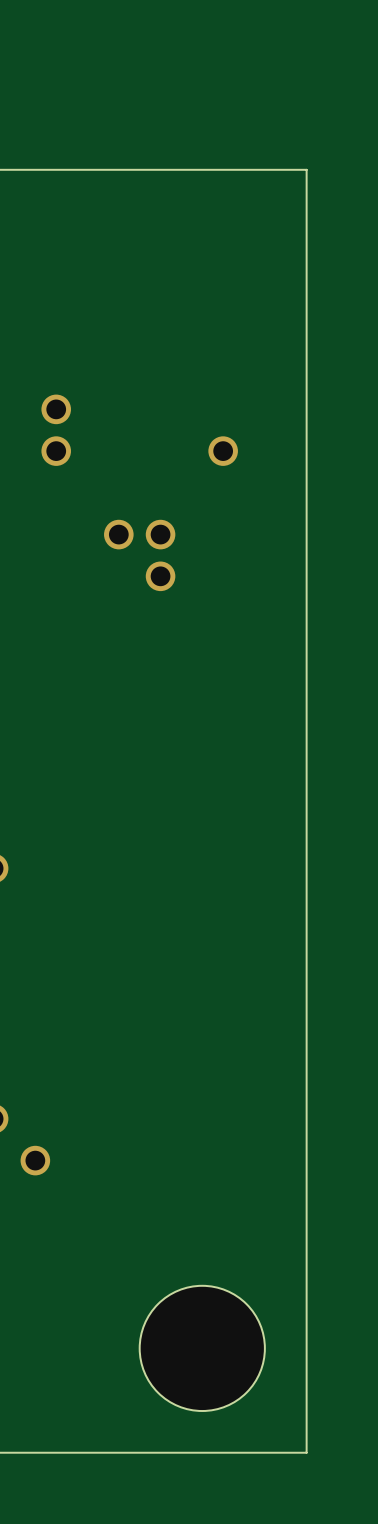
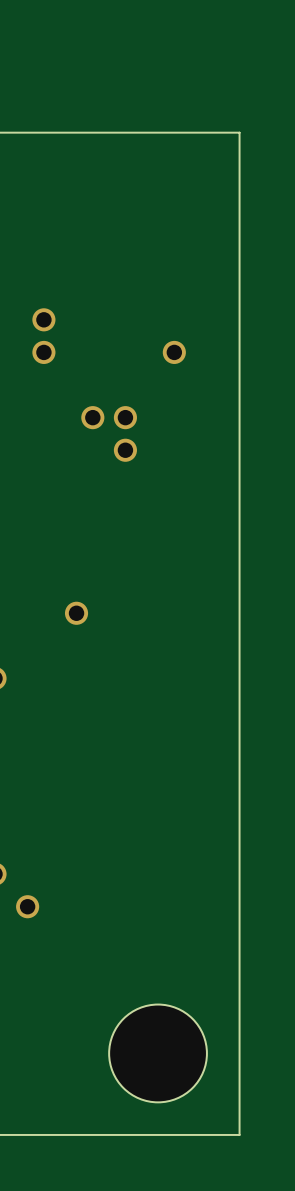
via: none -> (76, 613)

